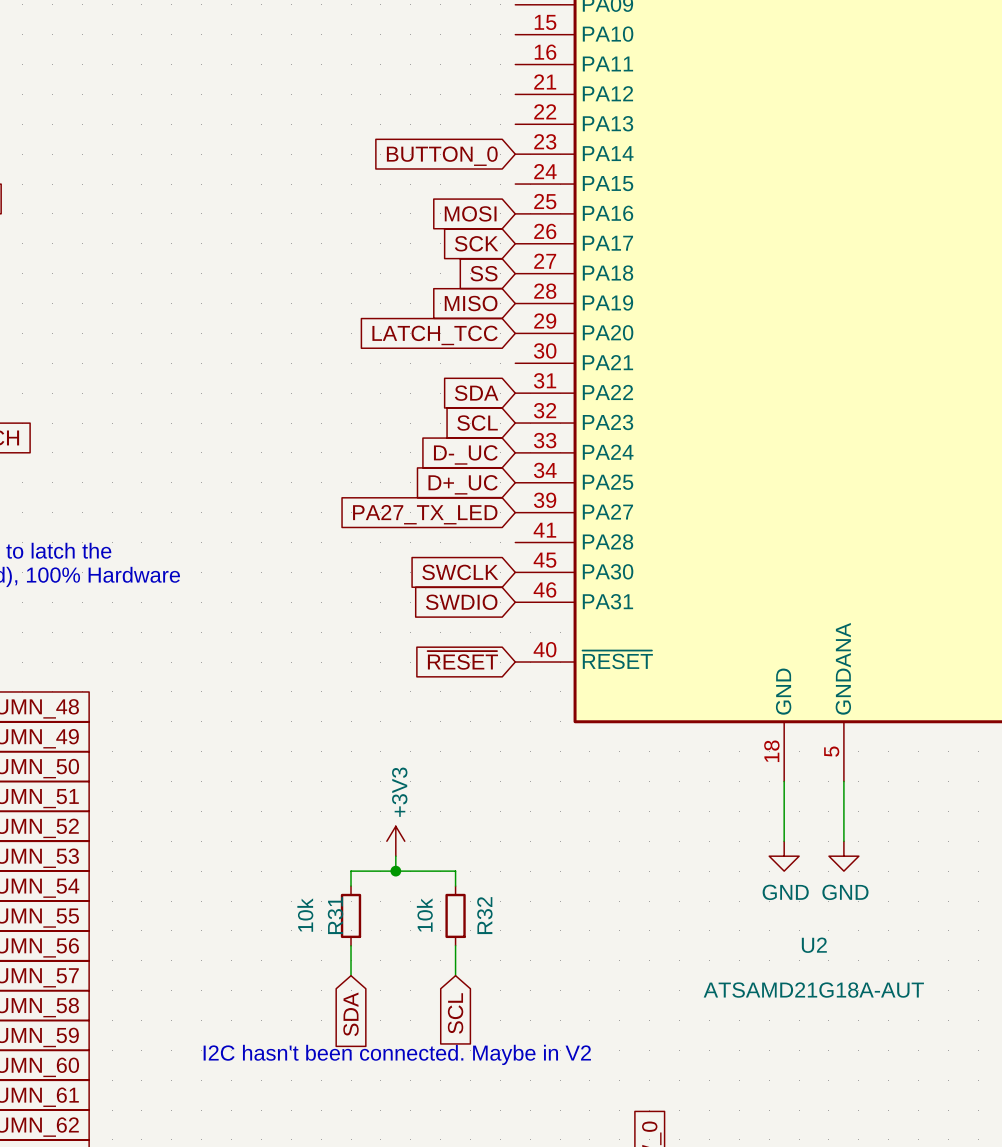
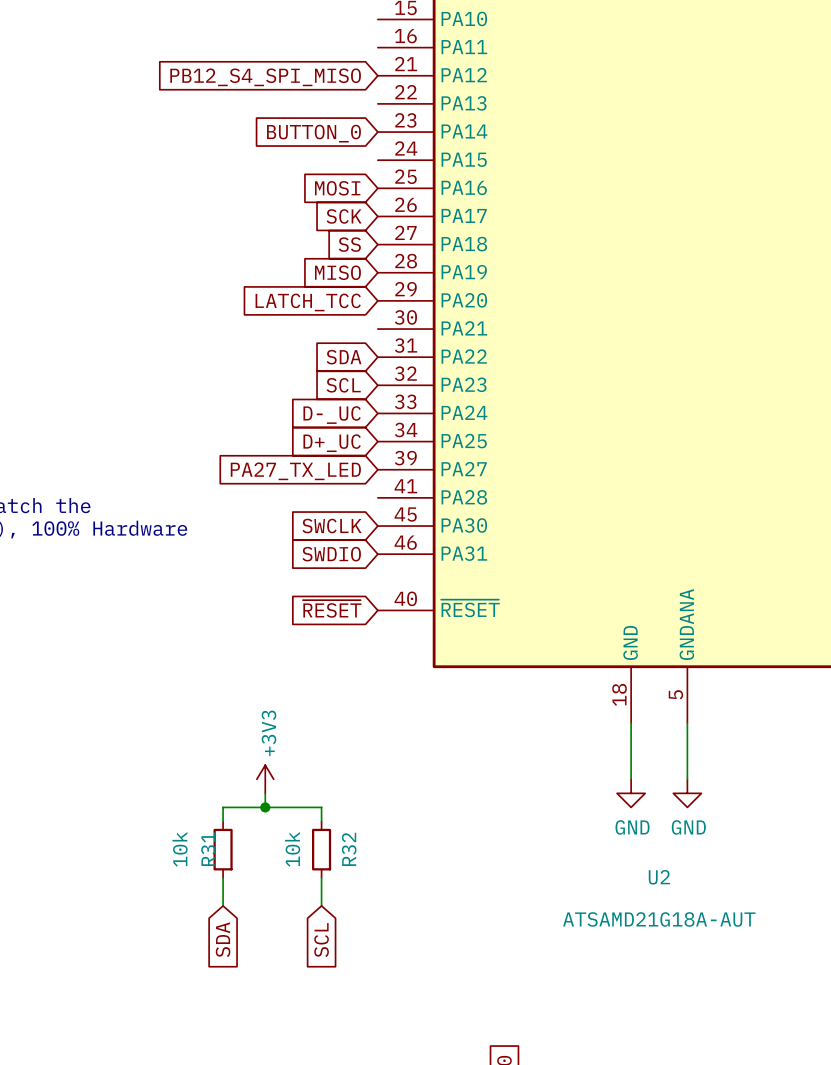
global label: none -> PB12_S4_SPI_MISO (265, 77)
text: I2C hasn't been connected. Maybe in V2 (397, 1054) -> none

